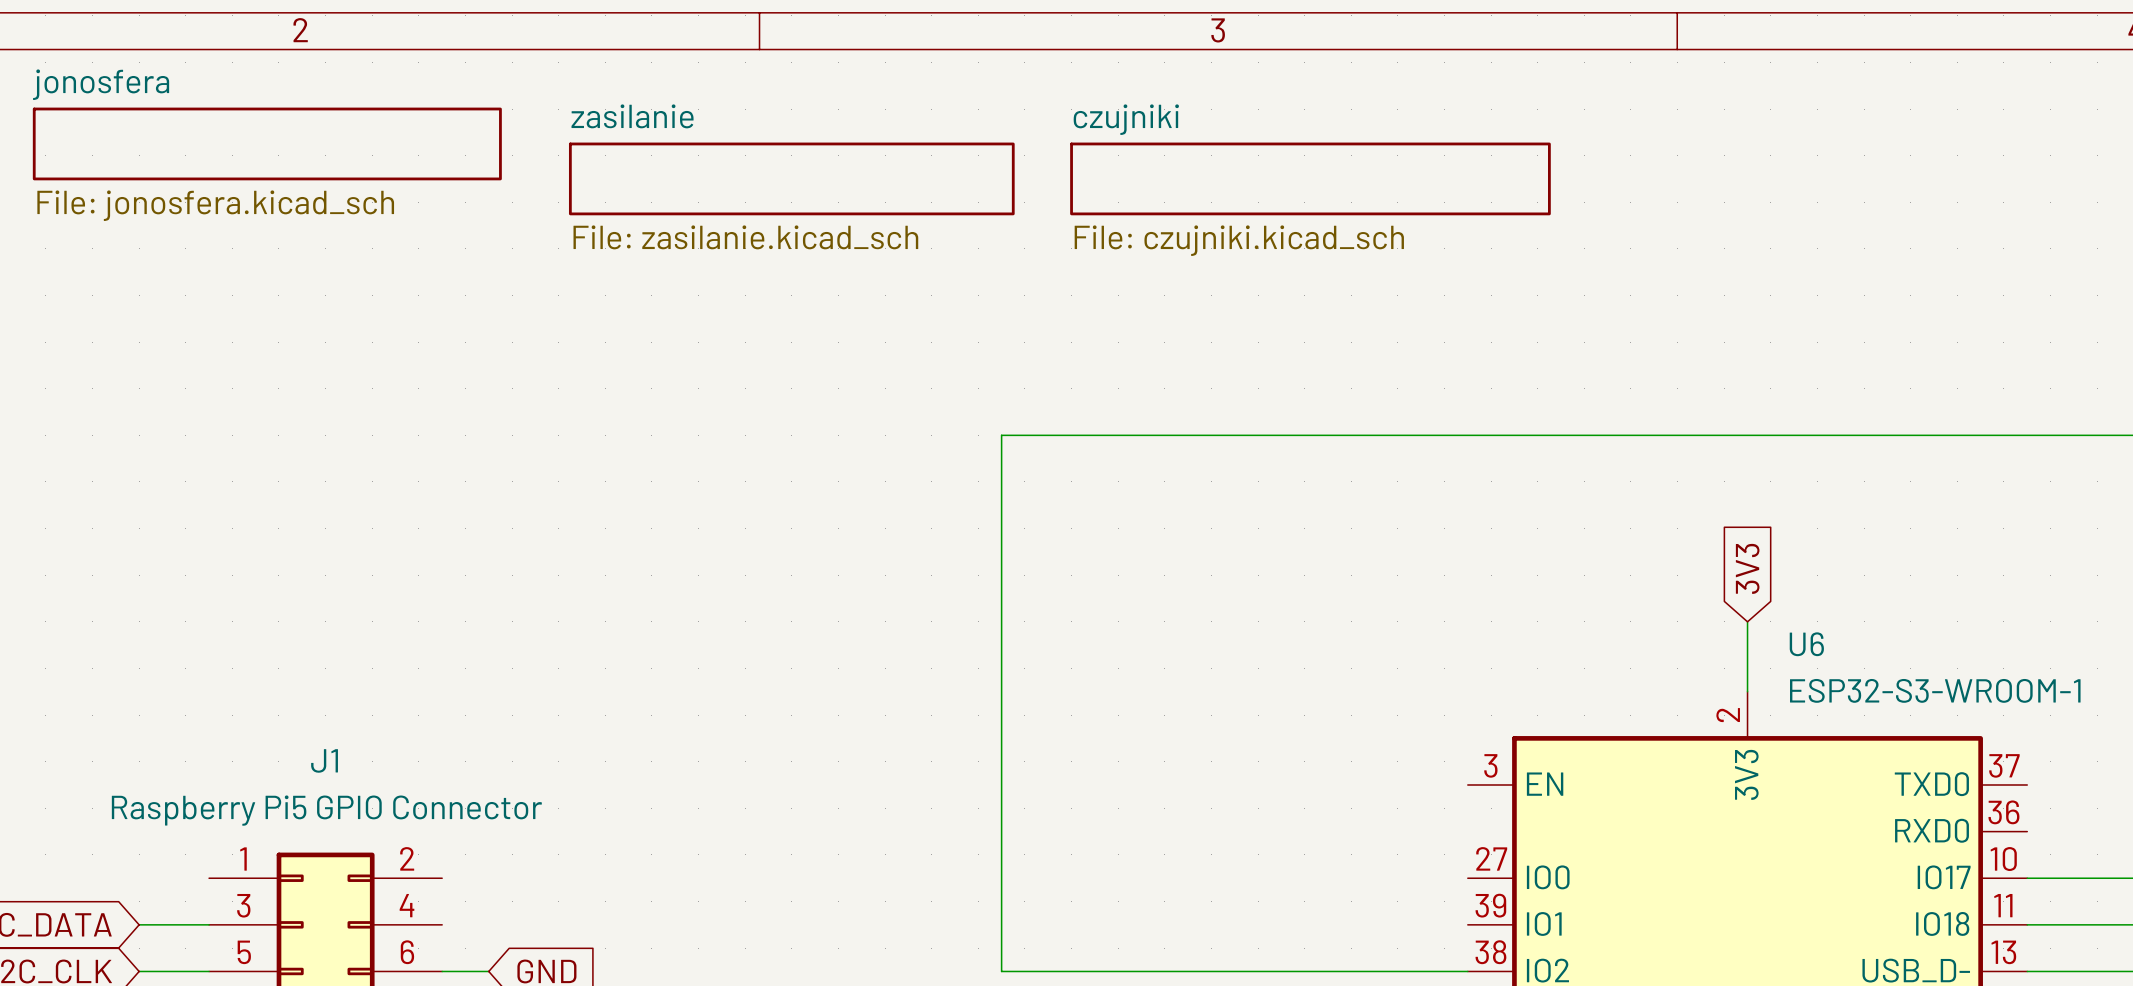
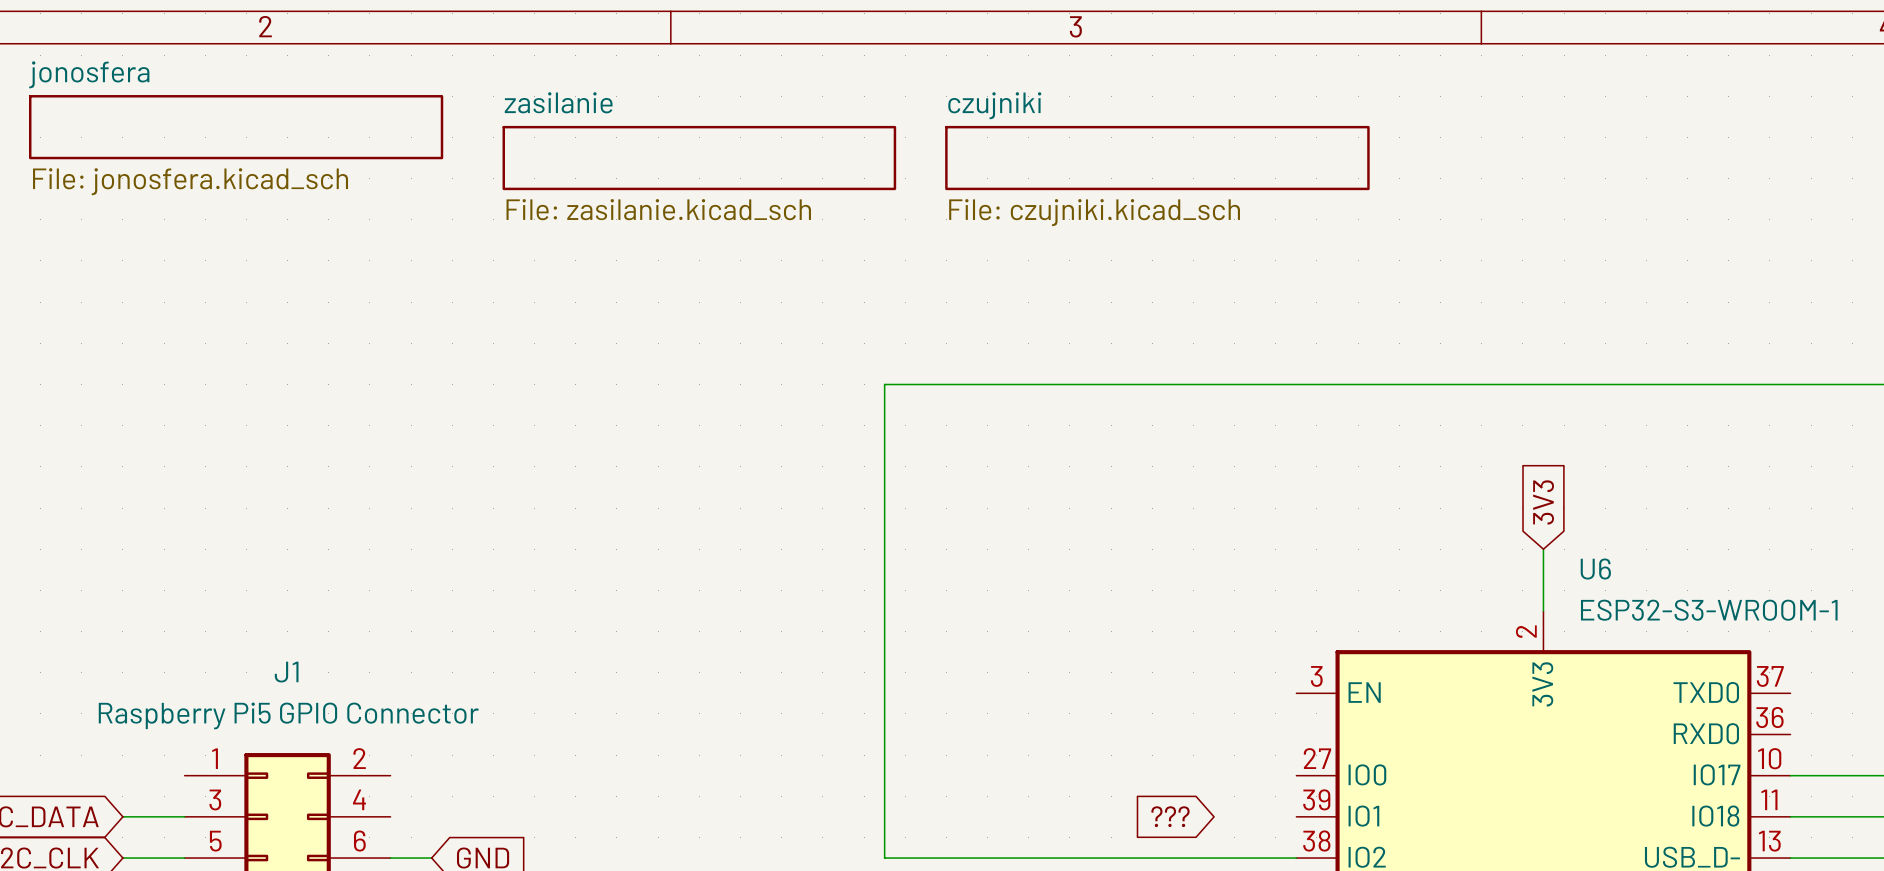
global label: none -> ??? (1170, 816)

